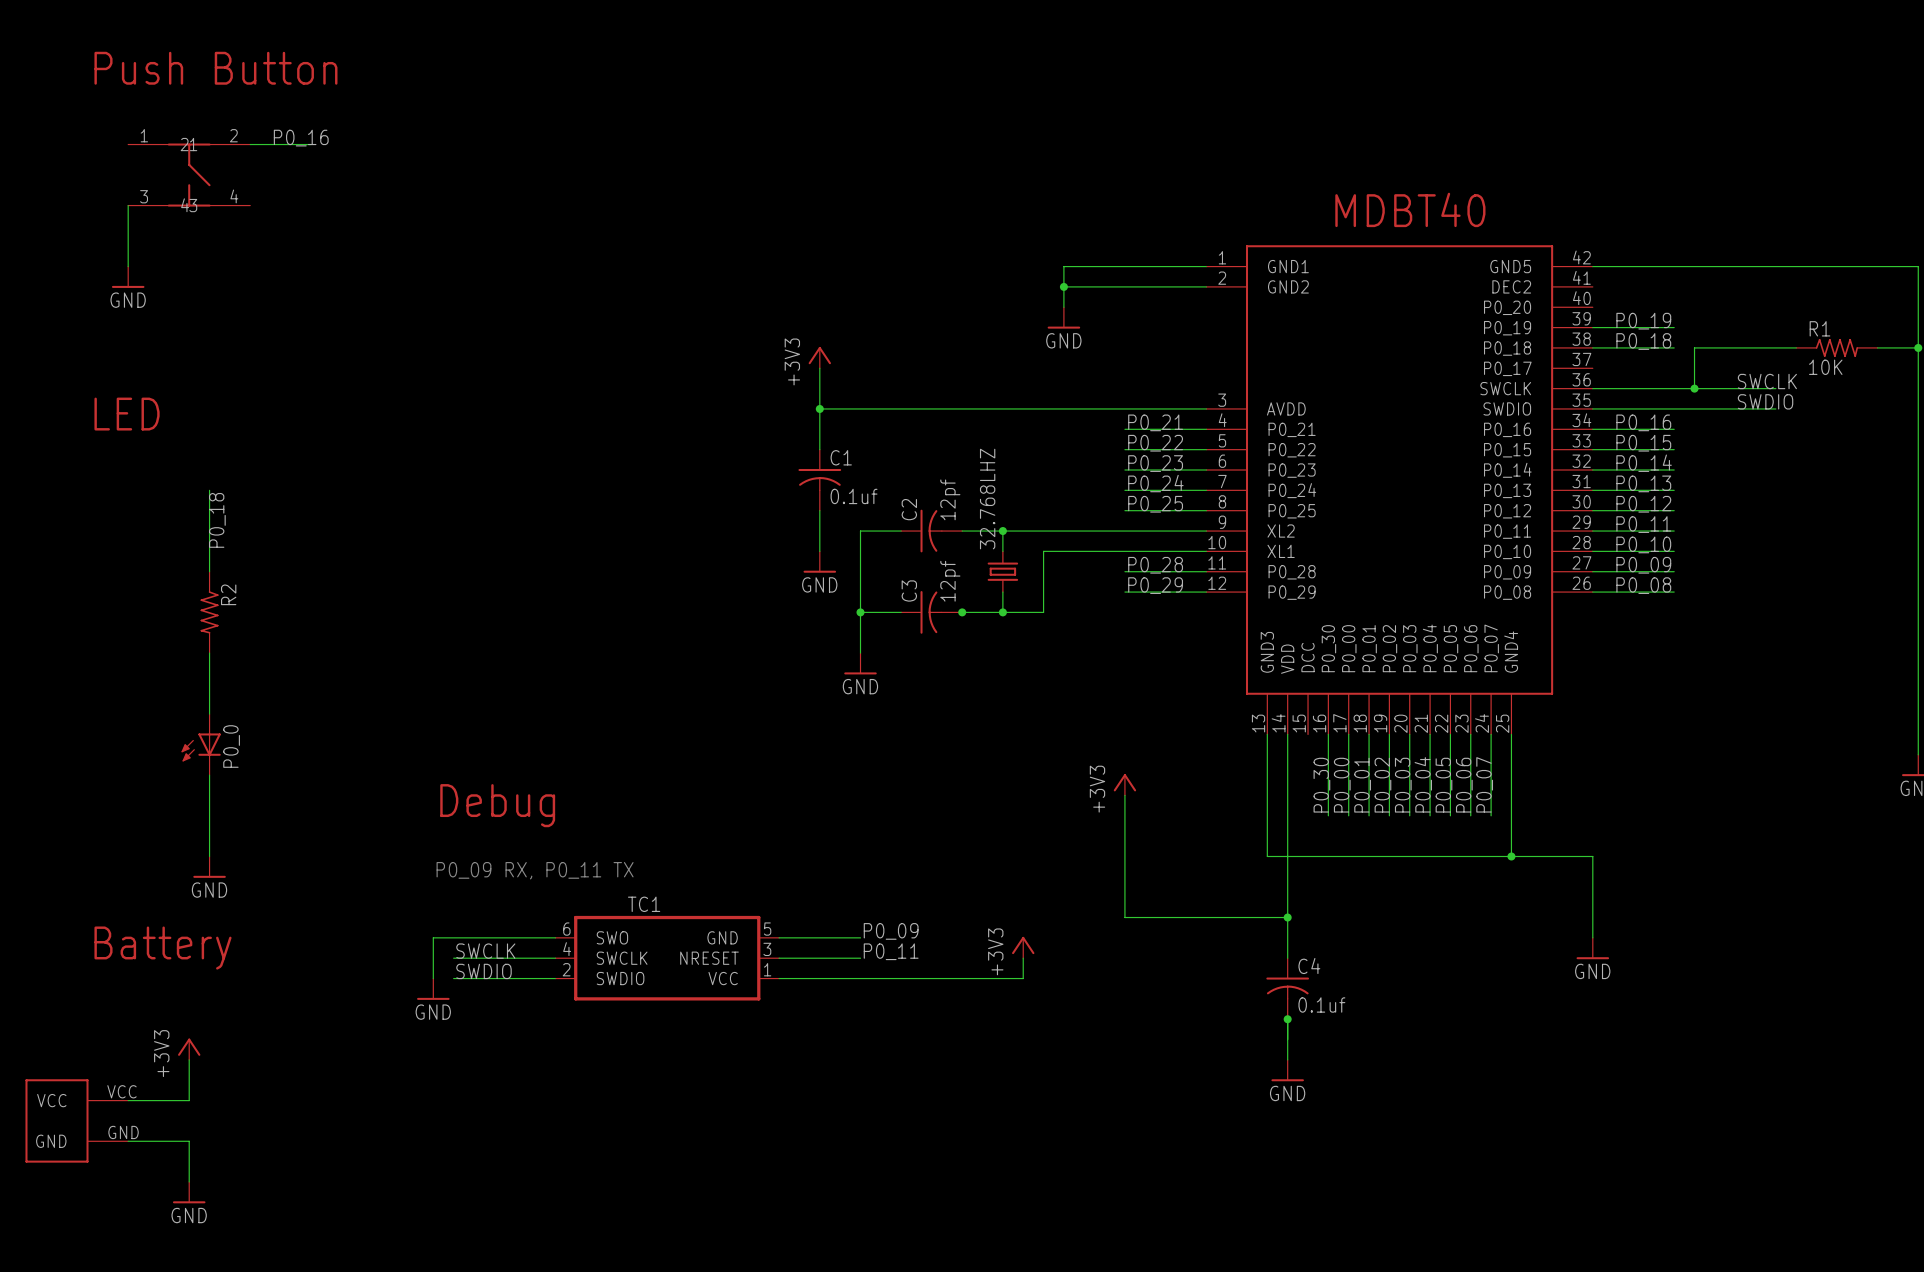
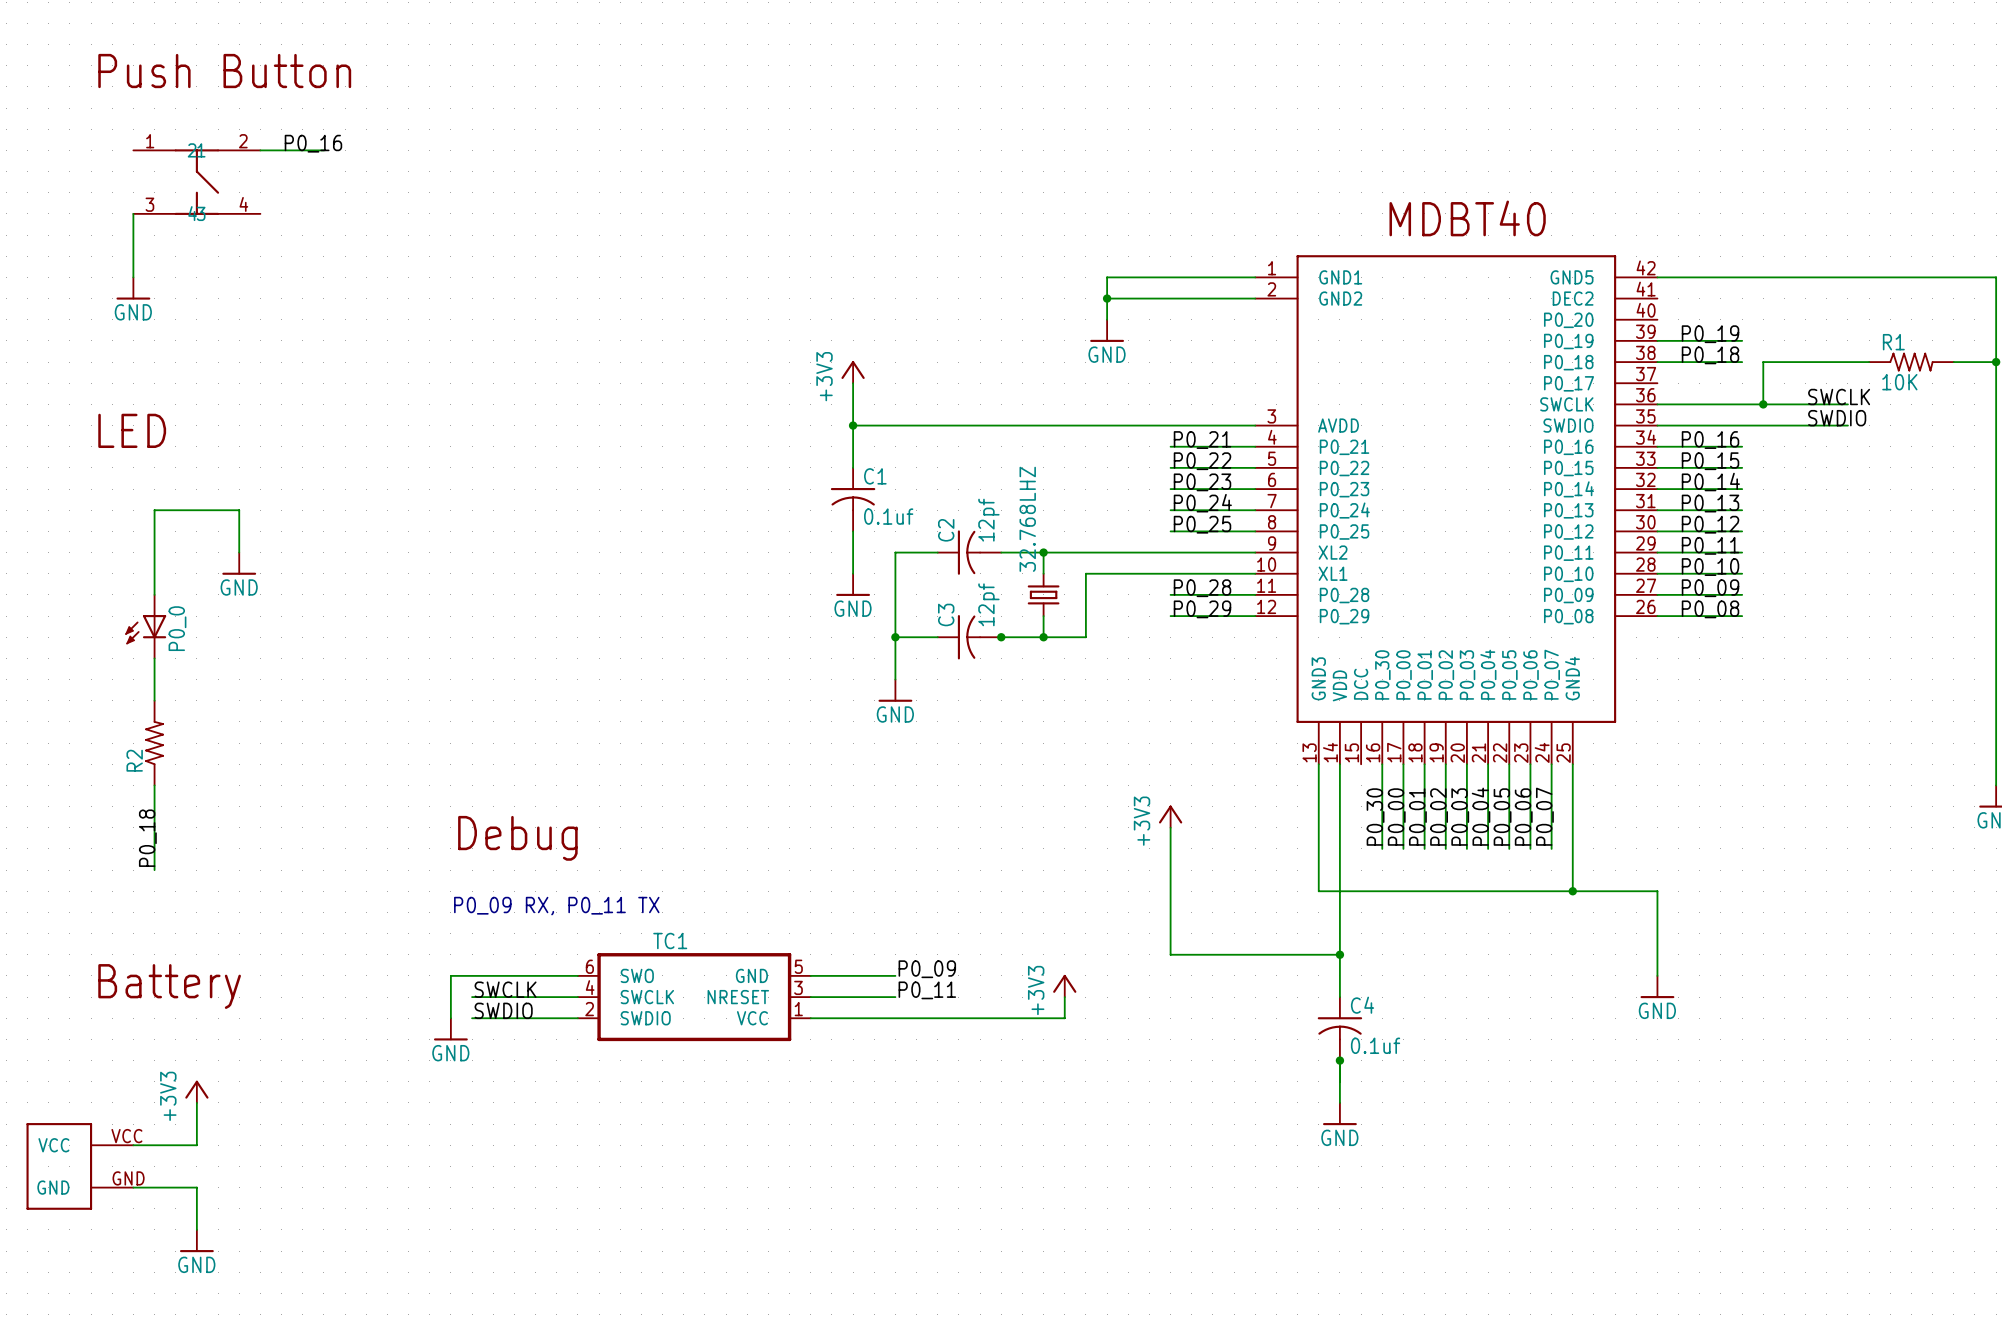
wire: (209, 490) (209, 571) -> none
label: P0_18 (217, 520) -> none
wire: none -> (239, 552) (239, 510) (154, 510) (154, 594)
power symbol: none -> GND (239, 563)
R2 rotation: 0° (209, 612) -> 180° (154, 743)
R2 position: (209, 612) -> (154, 743)
wire: none -> (154, 658) (154, 700)
wire: (209, 653) (209, 714) -> none
P0_0 position: (201, 744) -> (145, 626)
wire: (209, 775) (209, 856) -> (154, 785) (154, 870)
label: none -> P0_18 (147, 838)
power symbol: GND (209, 867) -> none

